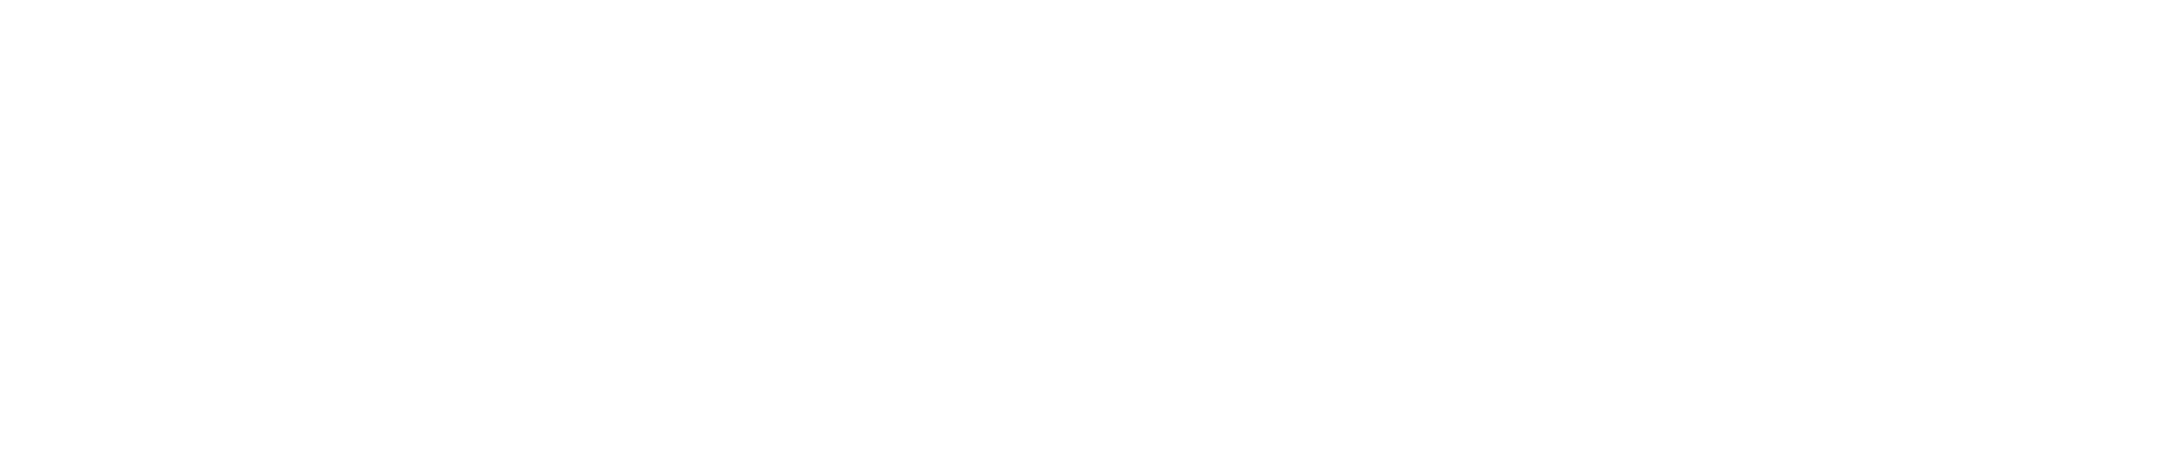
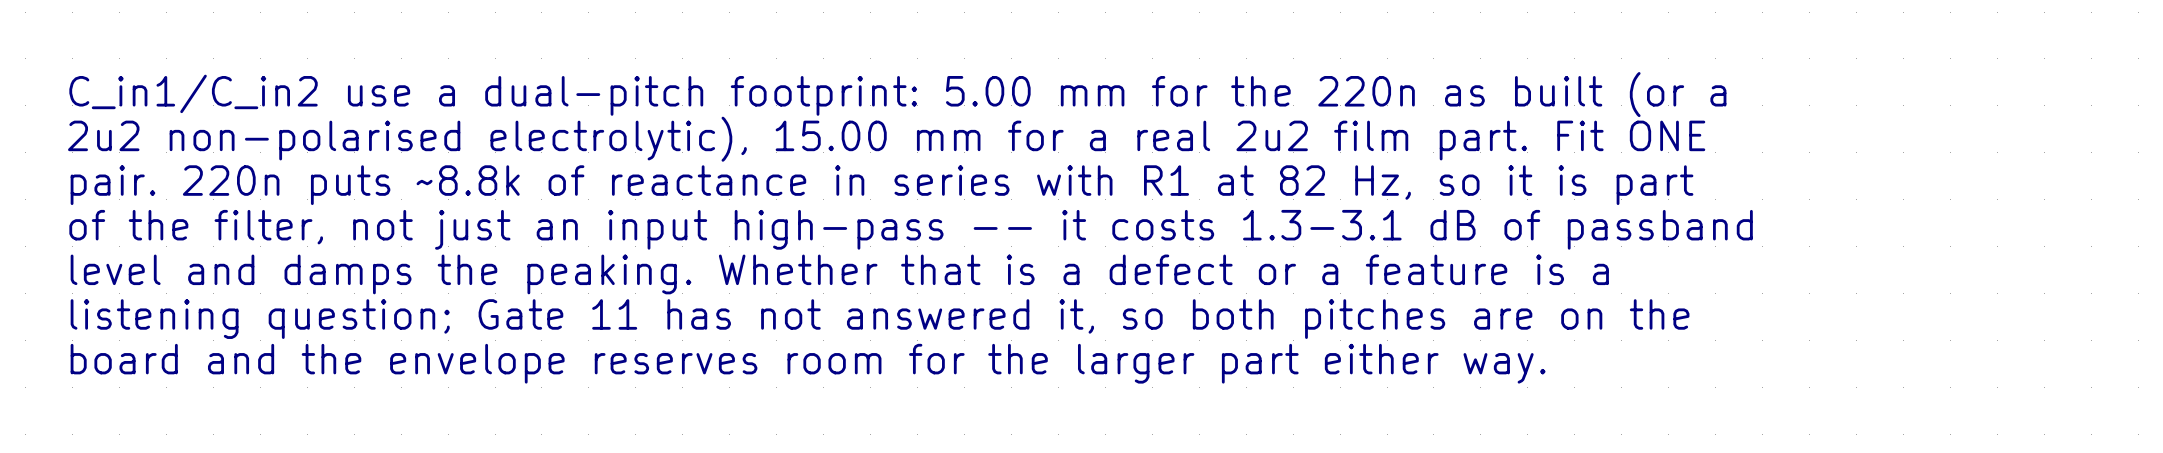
text: none -> C_in1/C_in2 use a dual-pitch footprint: 5.00 mm for the 220n as built (or a (897, 94)
text: none -> 2u2 non-polarised electrolytic), 15.00 mm for a real 2u2 film part. Fit ONE (886, 139)
text: none -> pair. 220n puts ~8.8k of reactance in series with R1 at 82 Hz, so it is part (882, 185)
text: none -> of the filter, not just an input high-pass -- it costs 1.3-3.1 dB of passband (911, 229)
text: none -> level and damps the peaking. Whether that is a defect or a feature is a (839, 274)
text: none -> listening question; Gate 11 has not answered it, so both pitches are on the (880, 319)
text: none -> board and the envelope reserves room for the larger part either way. (808, 363)

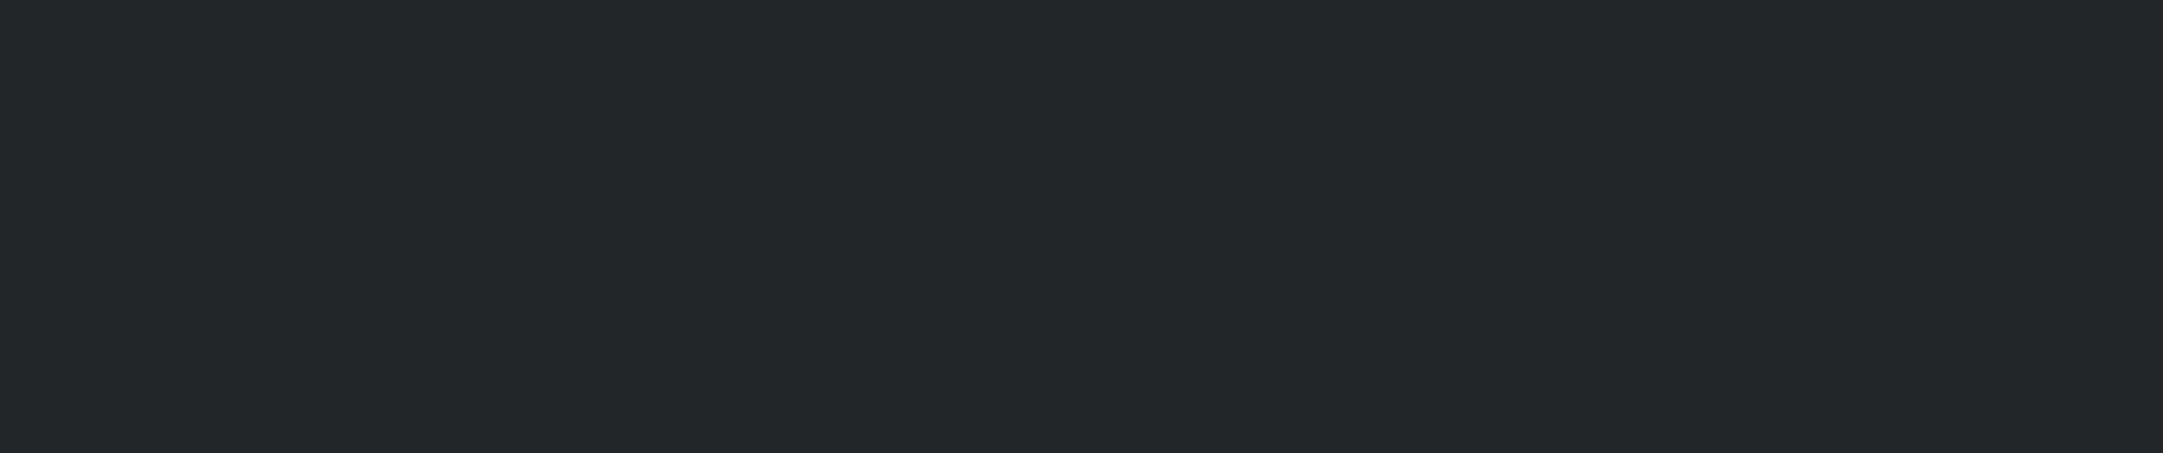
text: C_in1/C_in2 use a dual-pitch footprint: 5.00 mm for the 220n as built (or a (897, 94) -> none
text: 2u2 non-polarised electrolytic), 15.00 mm for a real 2u2 film part. Fit ONE (886, 139) -> none
text: pair. 220n puts ~8.8k of reactance in series with R1 at 82 Hz, so it is part (882, 185) -> none
text: of the filter, not just an input high-pass -- it costs 1.3-3.1 dB of passband (911, 229) -> none
text: level and damps the peaking. Whether that is a defect or a feature is a (839, 274) -> none
text: listening question; Gate 11 has not answered it, so both pitches are on the (880, 319) -> none
text: board and the envelope reserves room for the larger part either way. (808, 363) -> none

